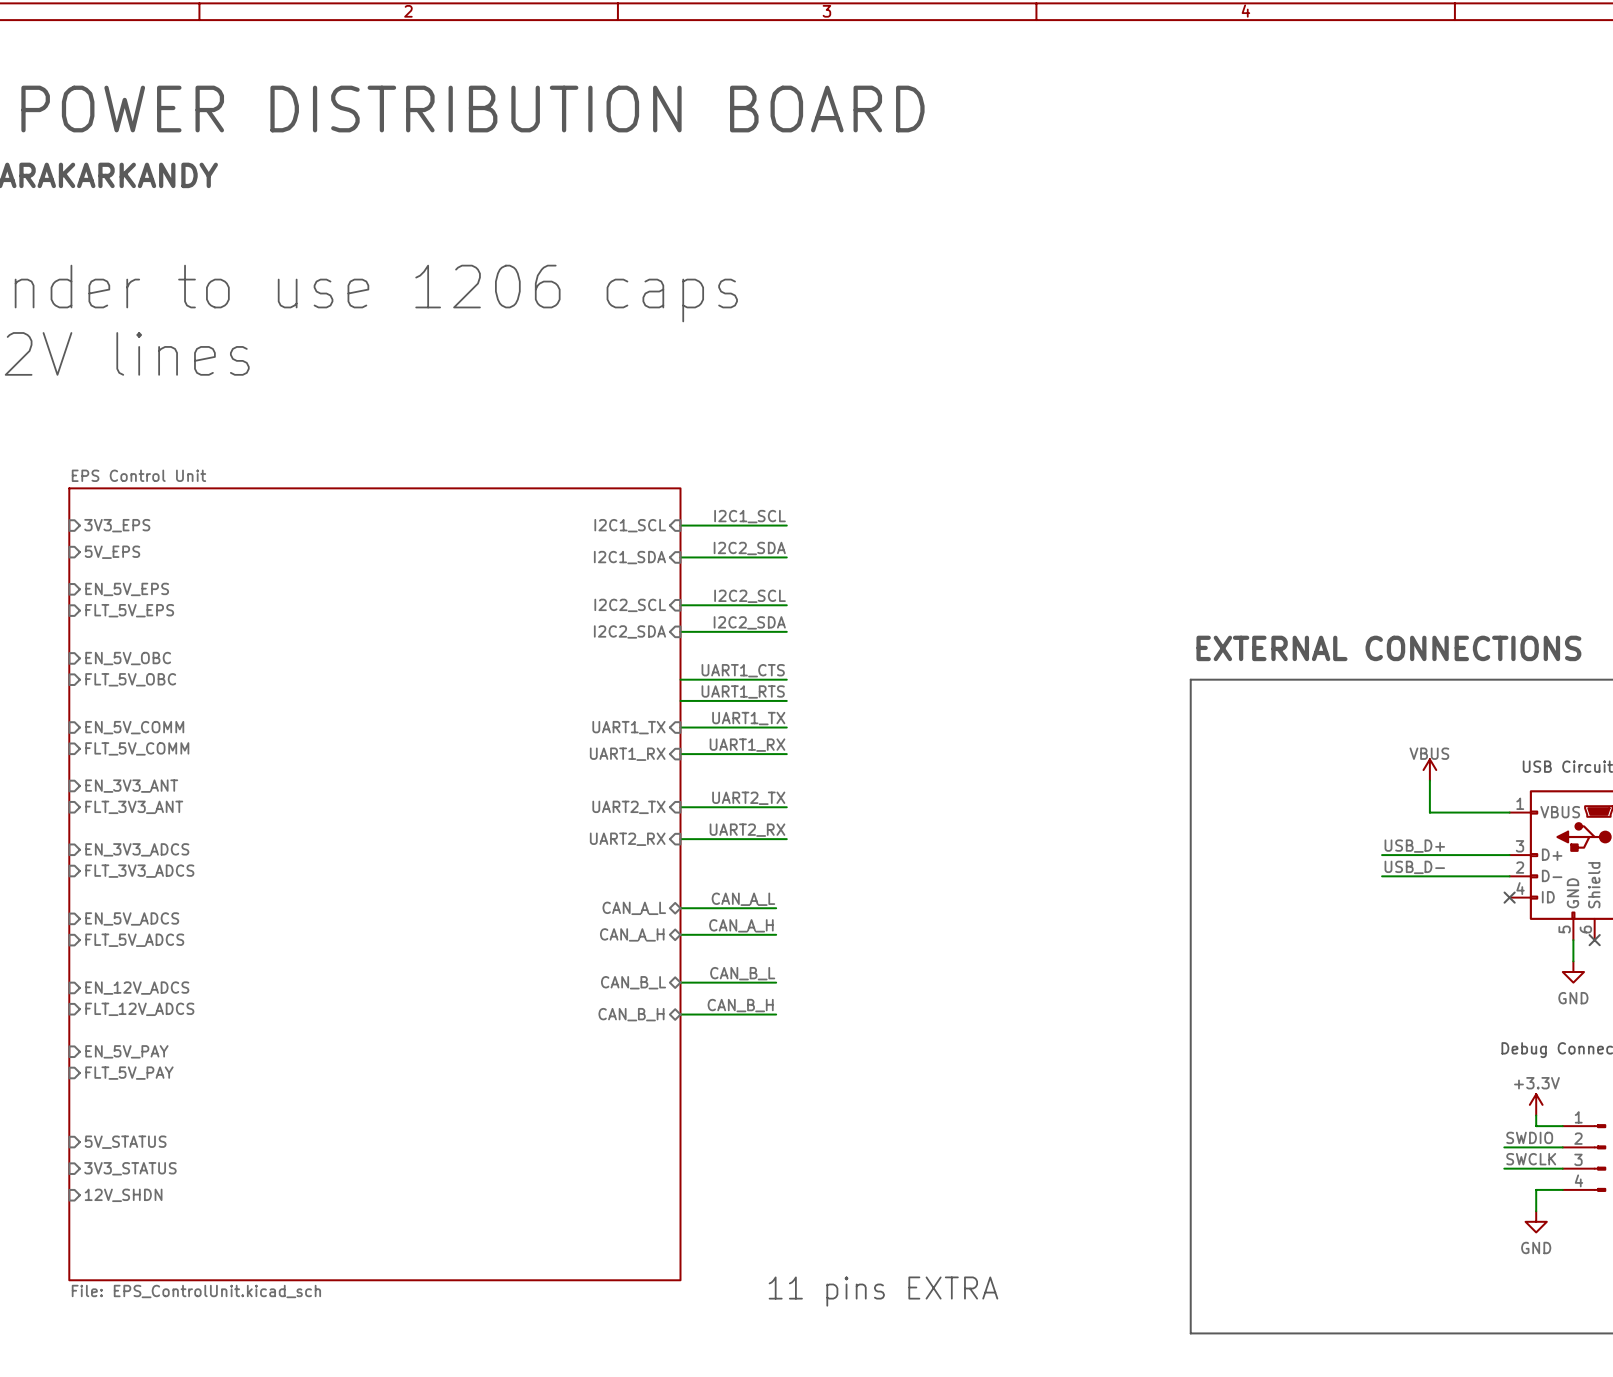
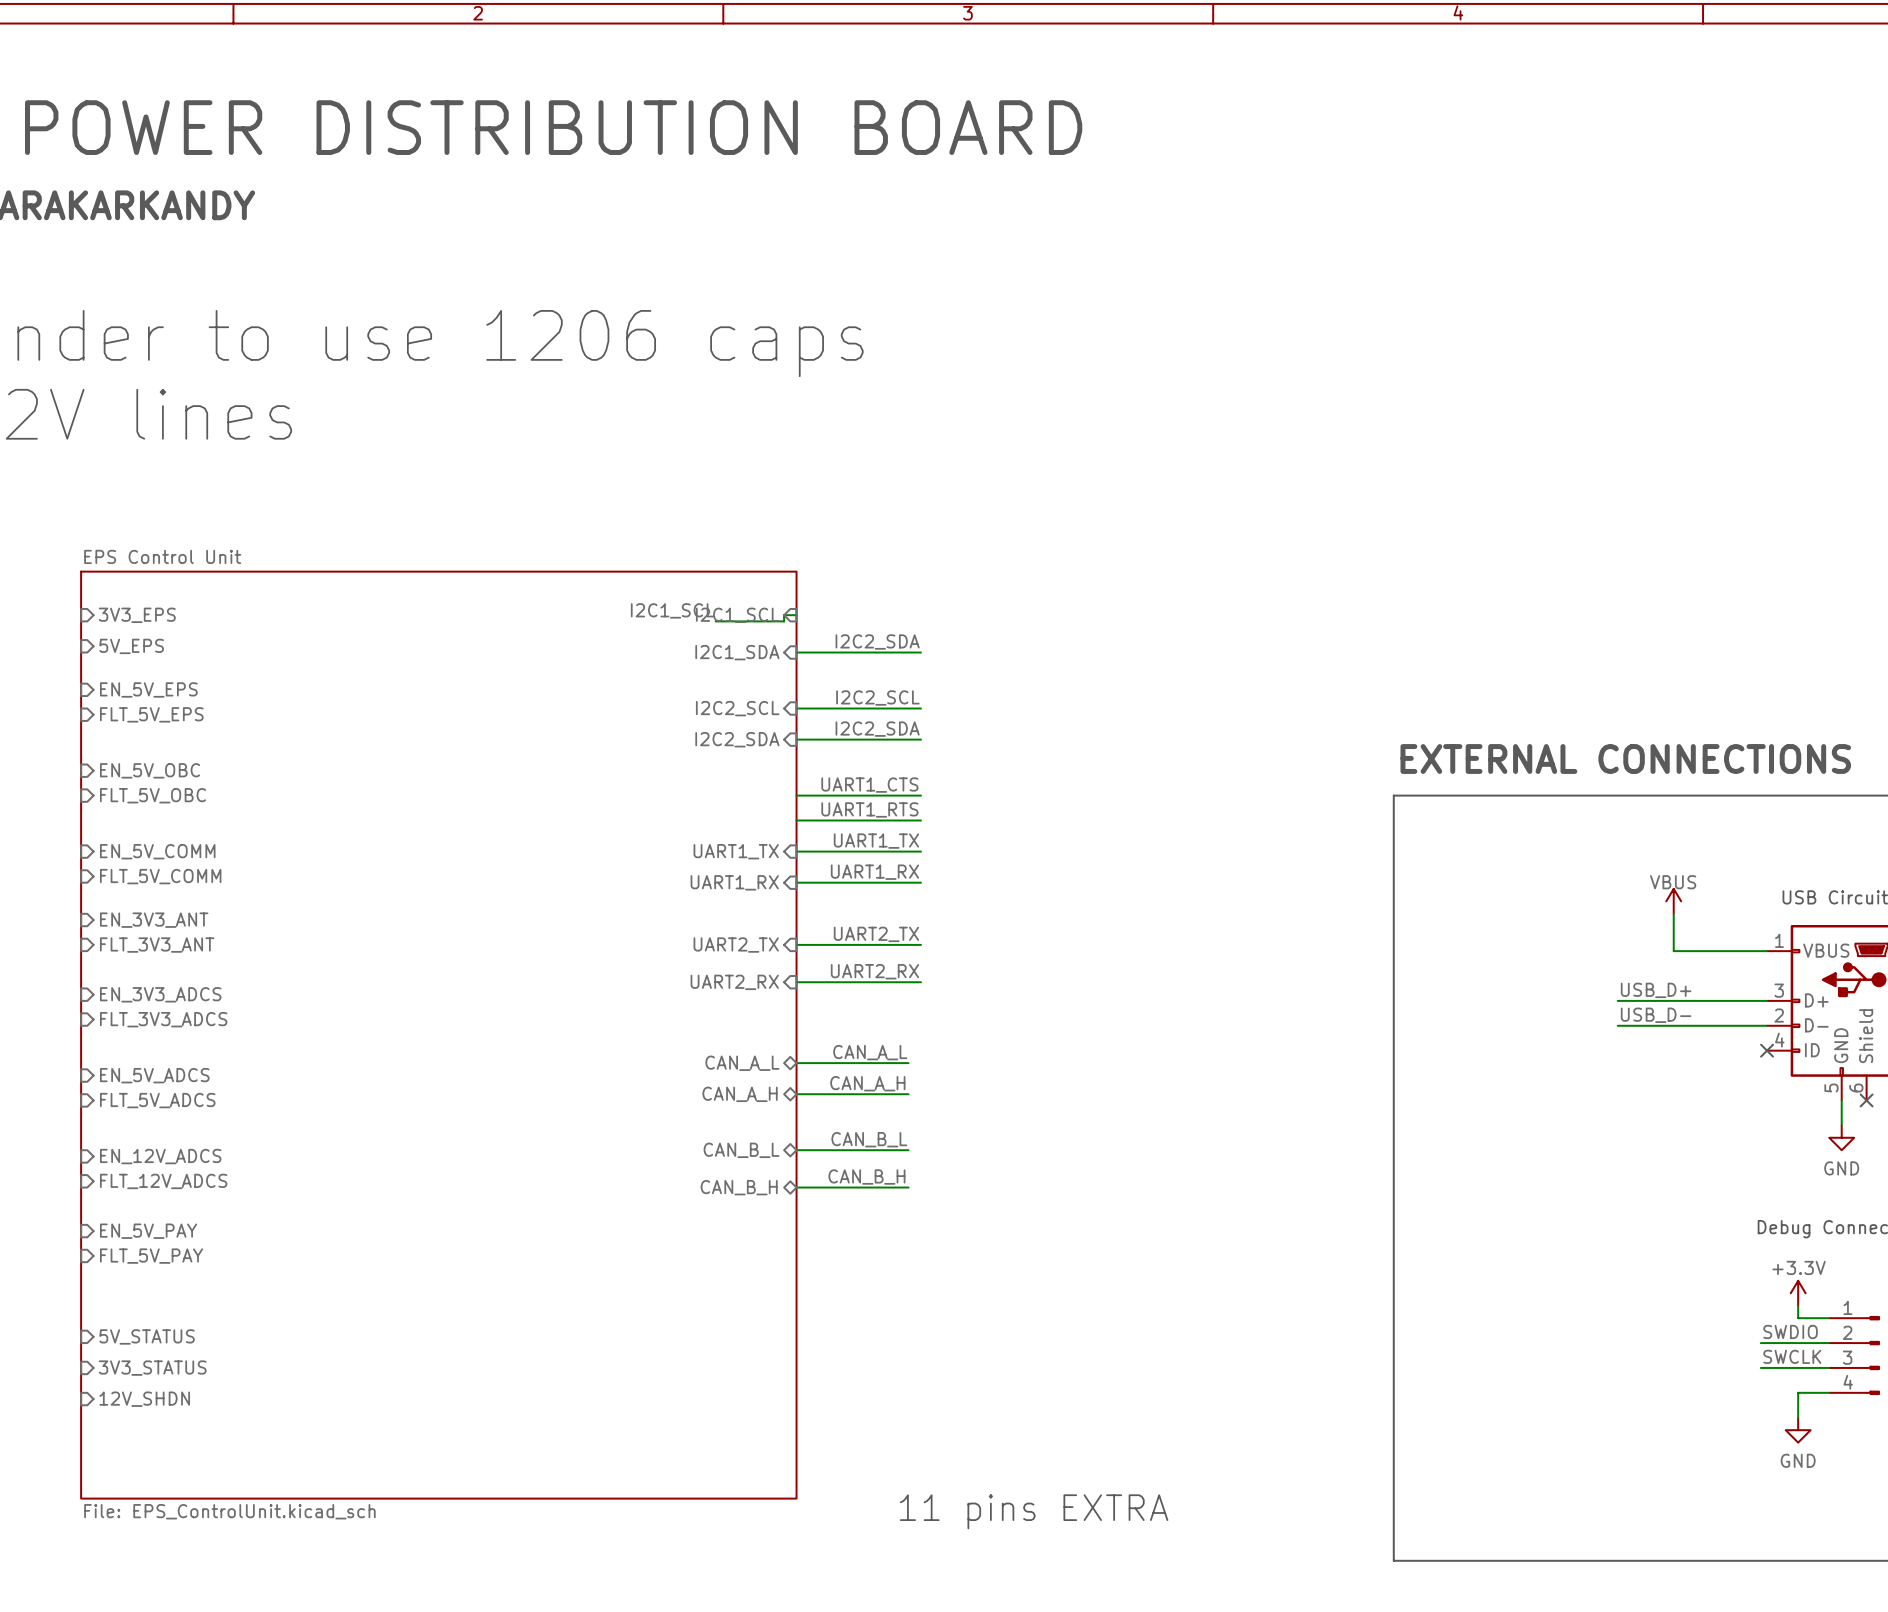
label position: I2C1_SCL (750, 516) -> I2C1_SCL (672, 610)
wire: (680, 525) (786, 525) -> (796, 615) (784, 615) (784, 621) (715, 621)

